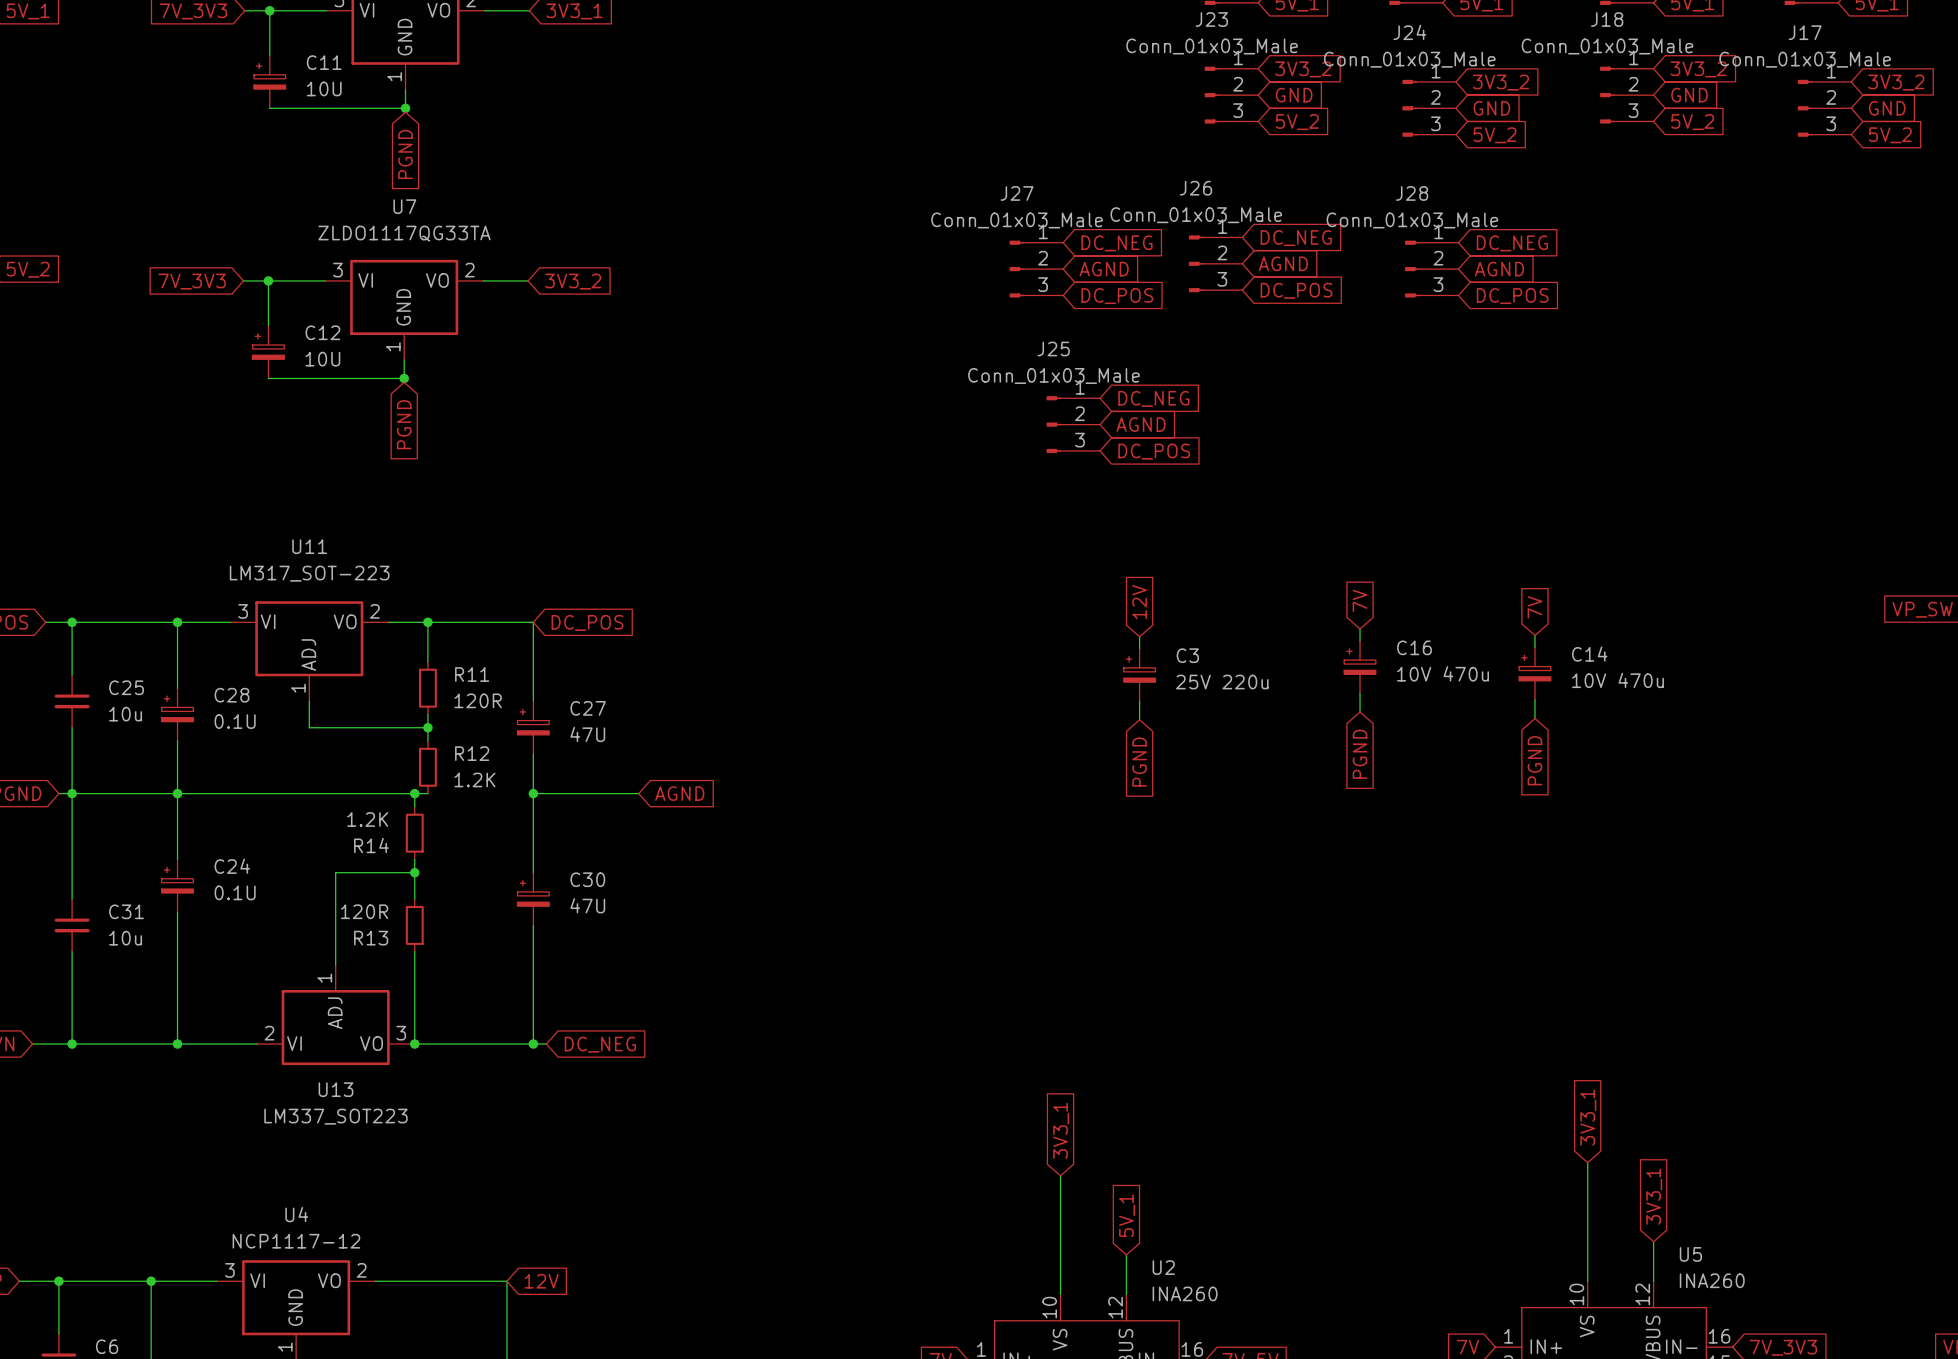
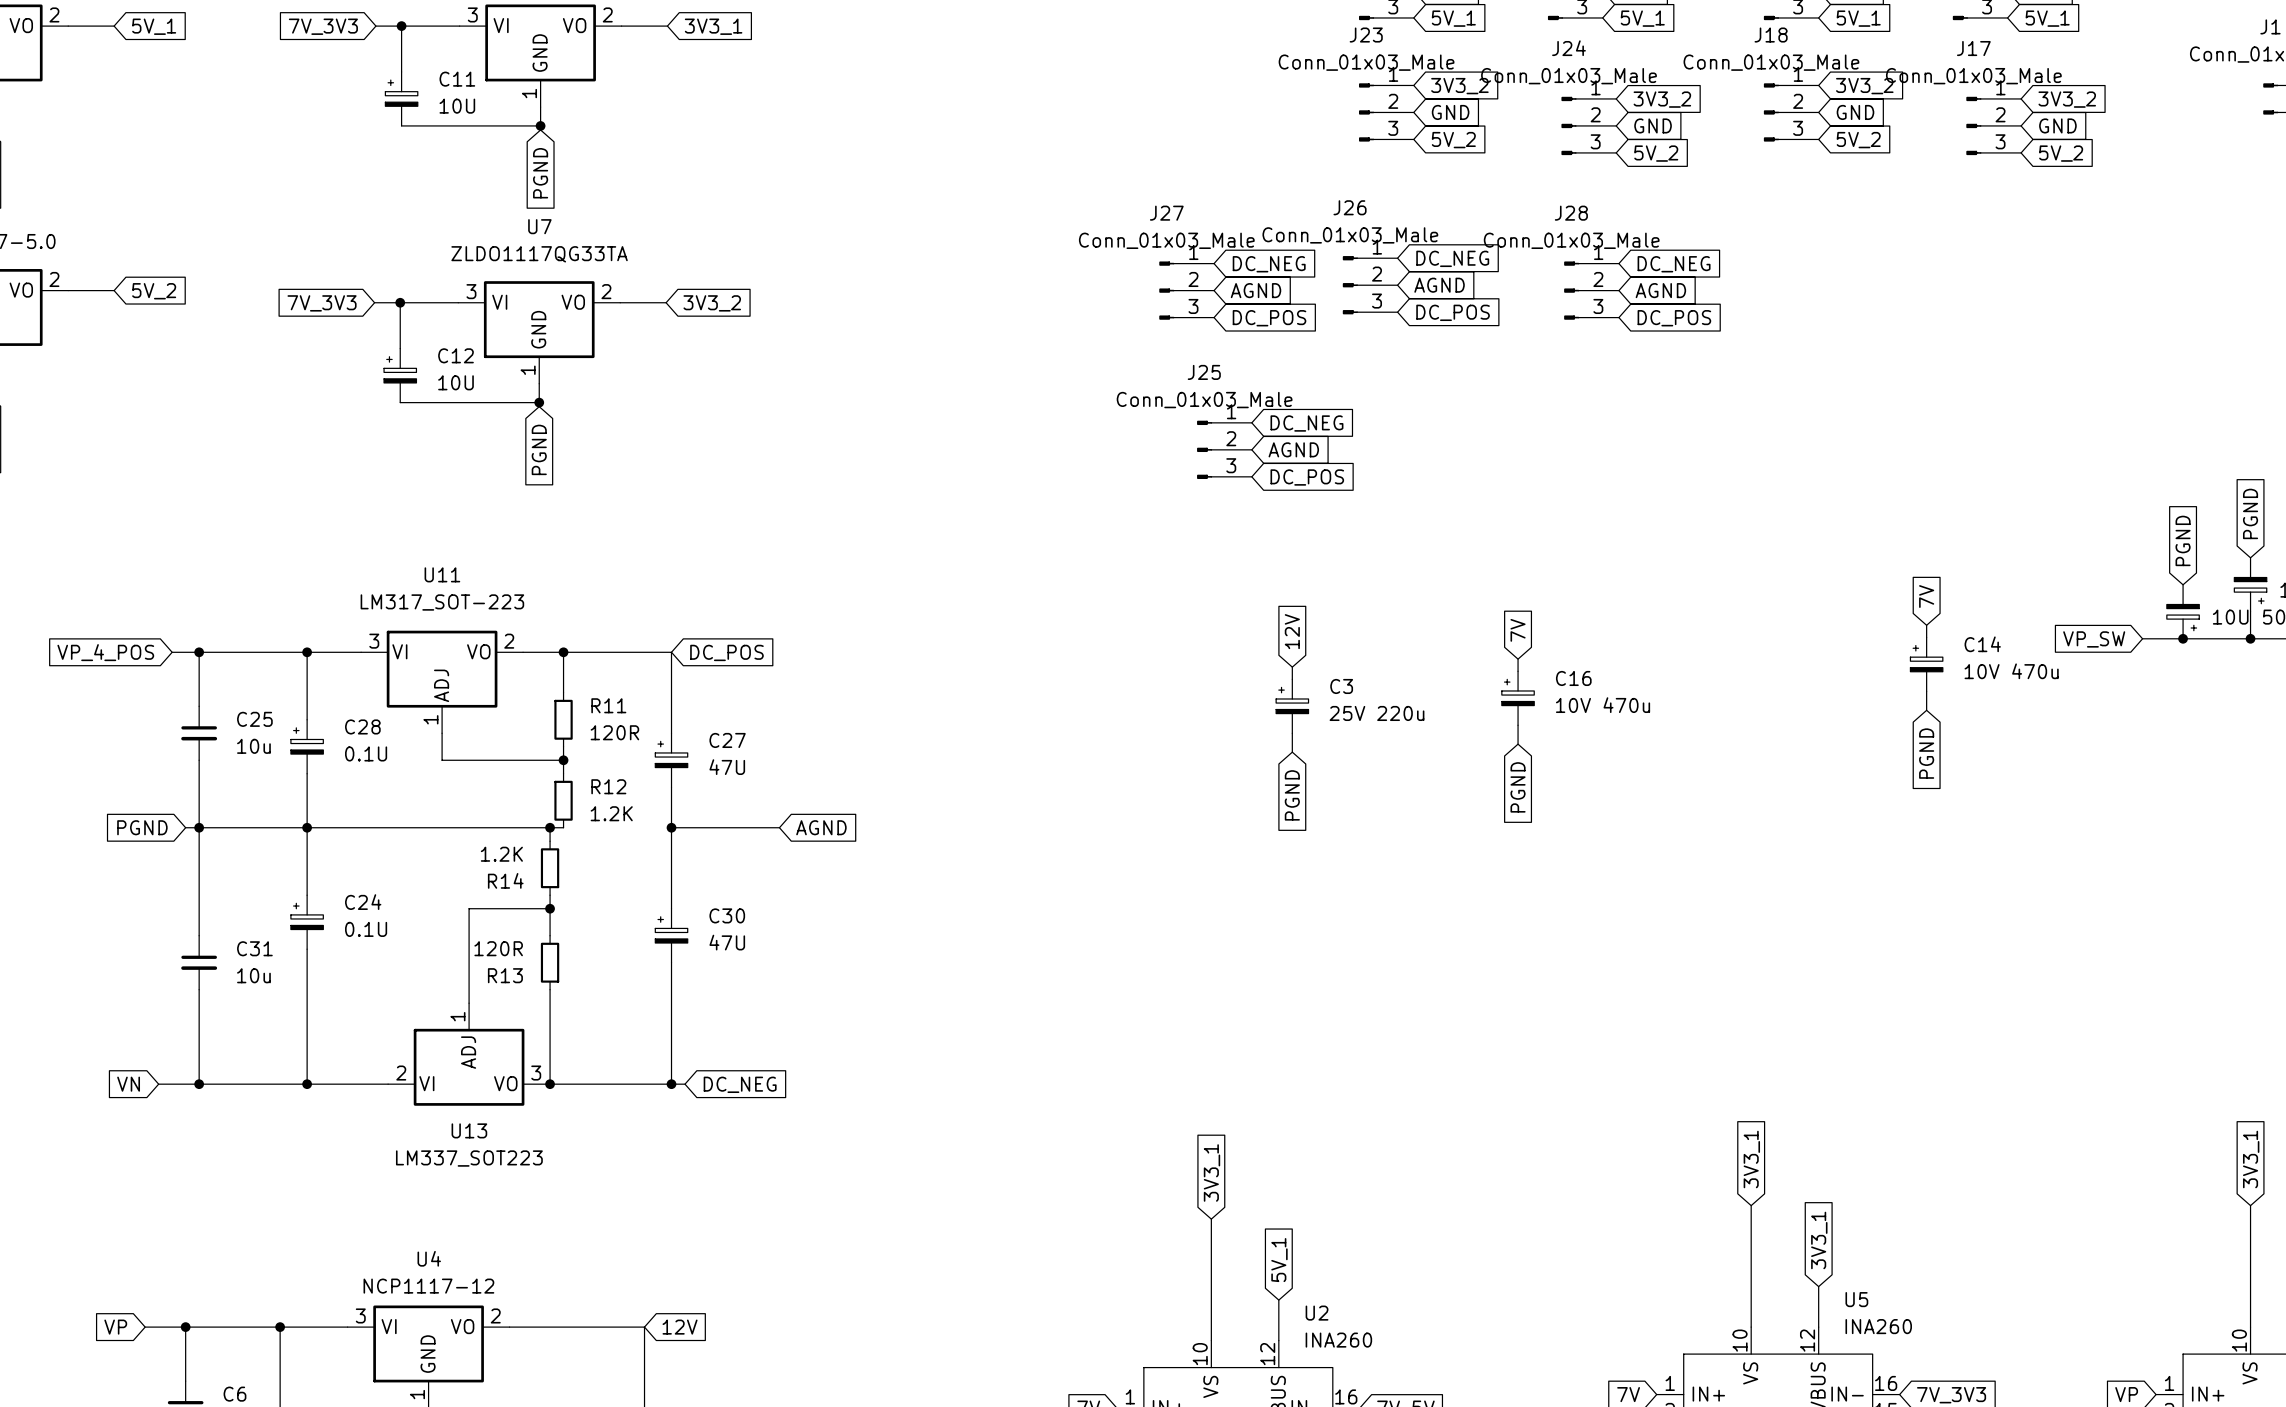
global label position: 7V (1534, 607) -> 7V (1926, 596)
wire: (1534, 635) (1534, 647) -> (1926, 625) (1926, 637)
C14 position: (1534, 673) -> (1926, 664)
wire: (1534, 700) (1534, 718) -> (1926, 691) (1926, 710)
global label position: PGND (1534, 760) -> PGND (1926, 753)

